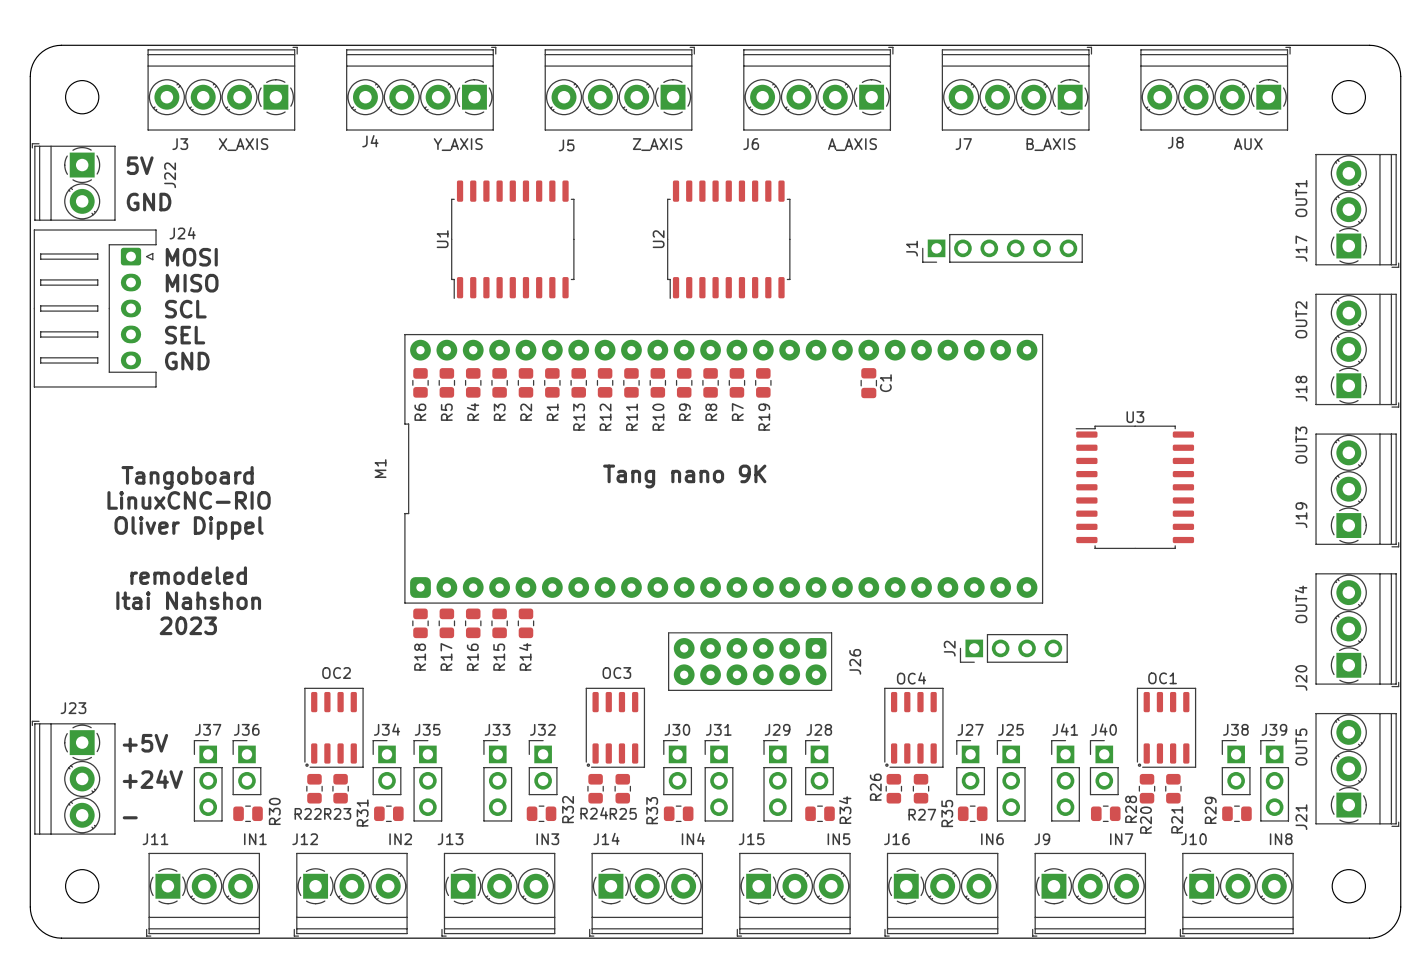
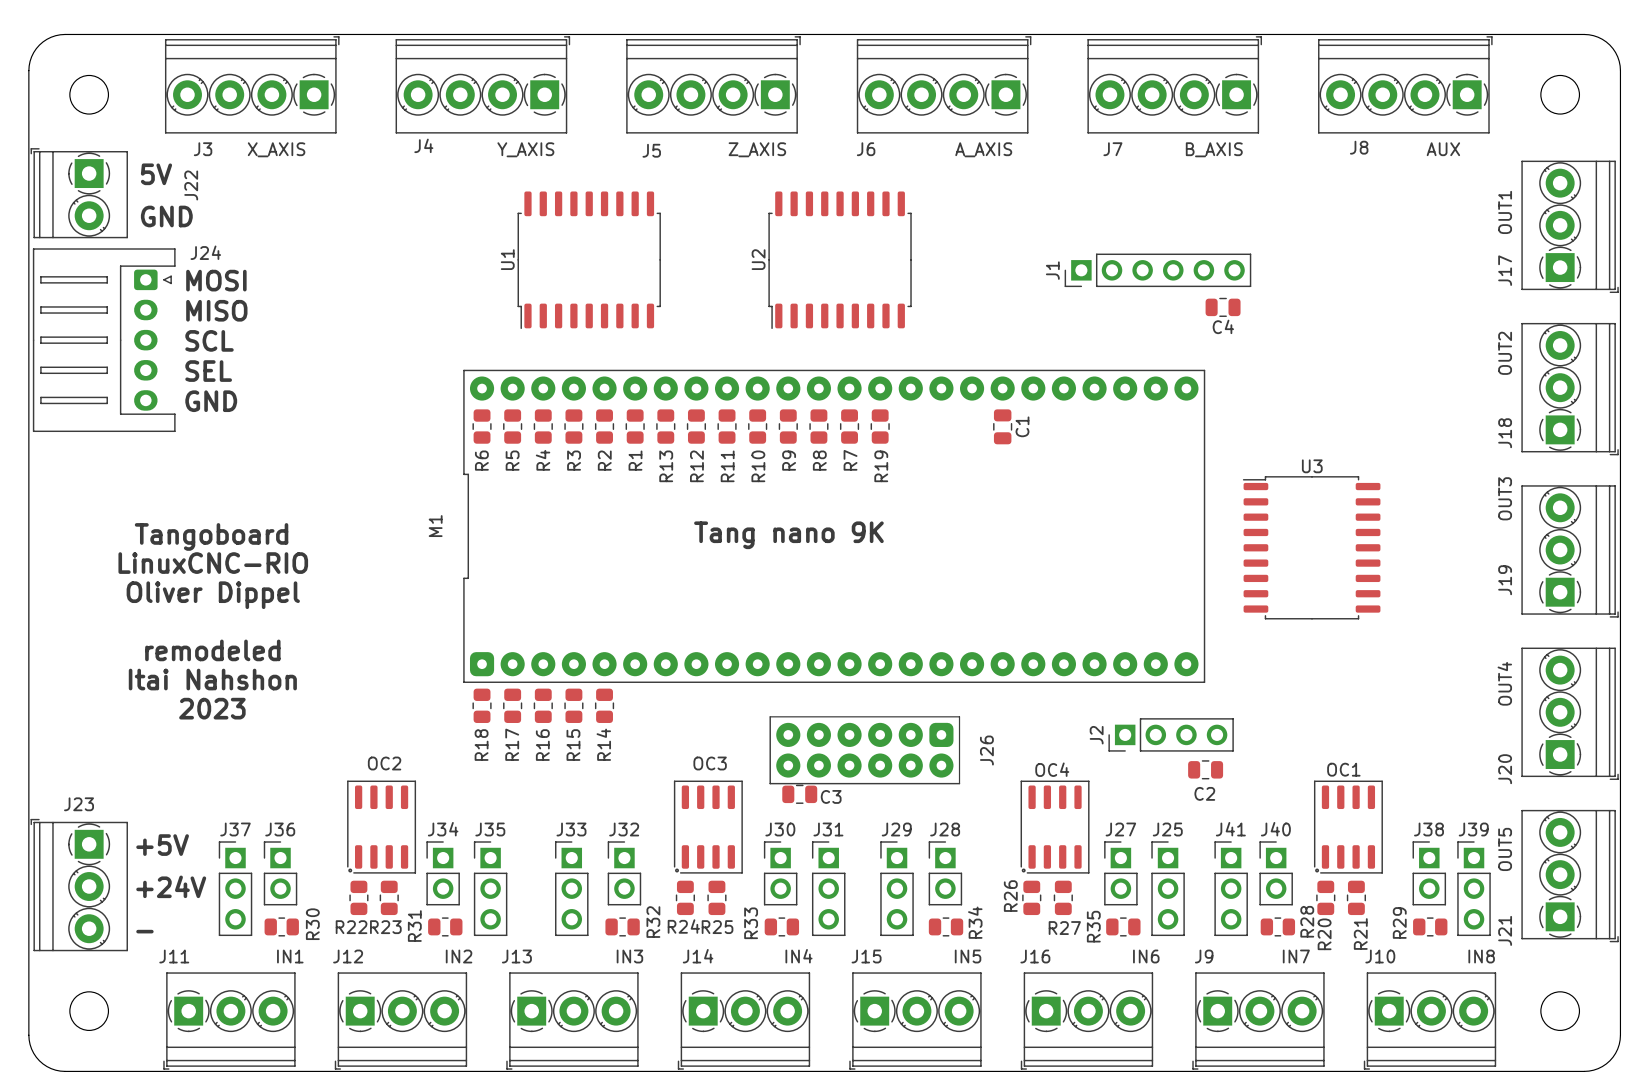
C4: none -> (1223, 307)
C2: none -> (1205, 769)
C3: none -> (799, 794)

